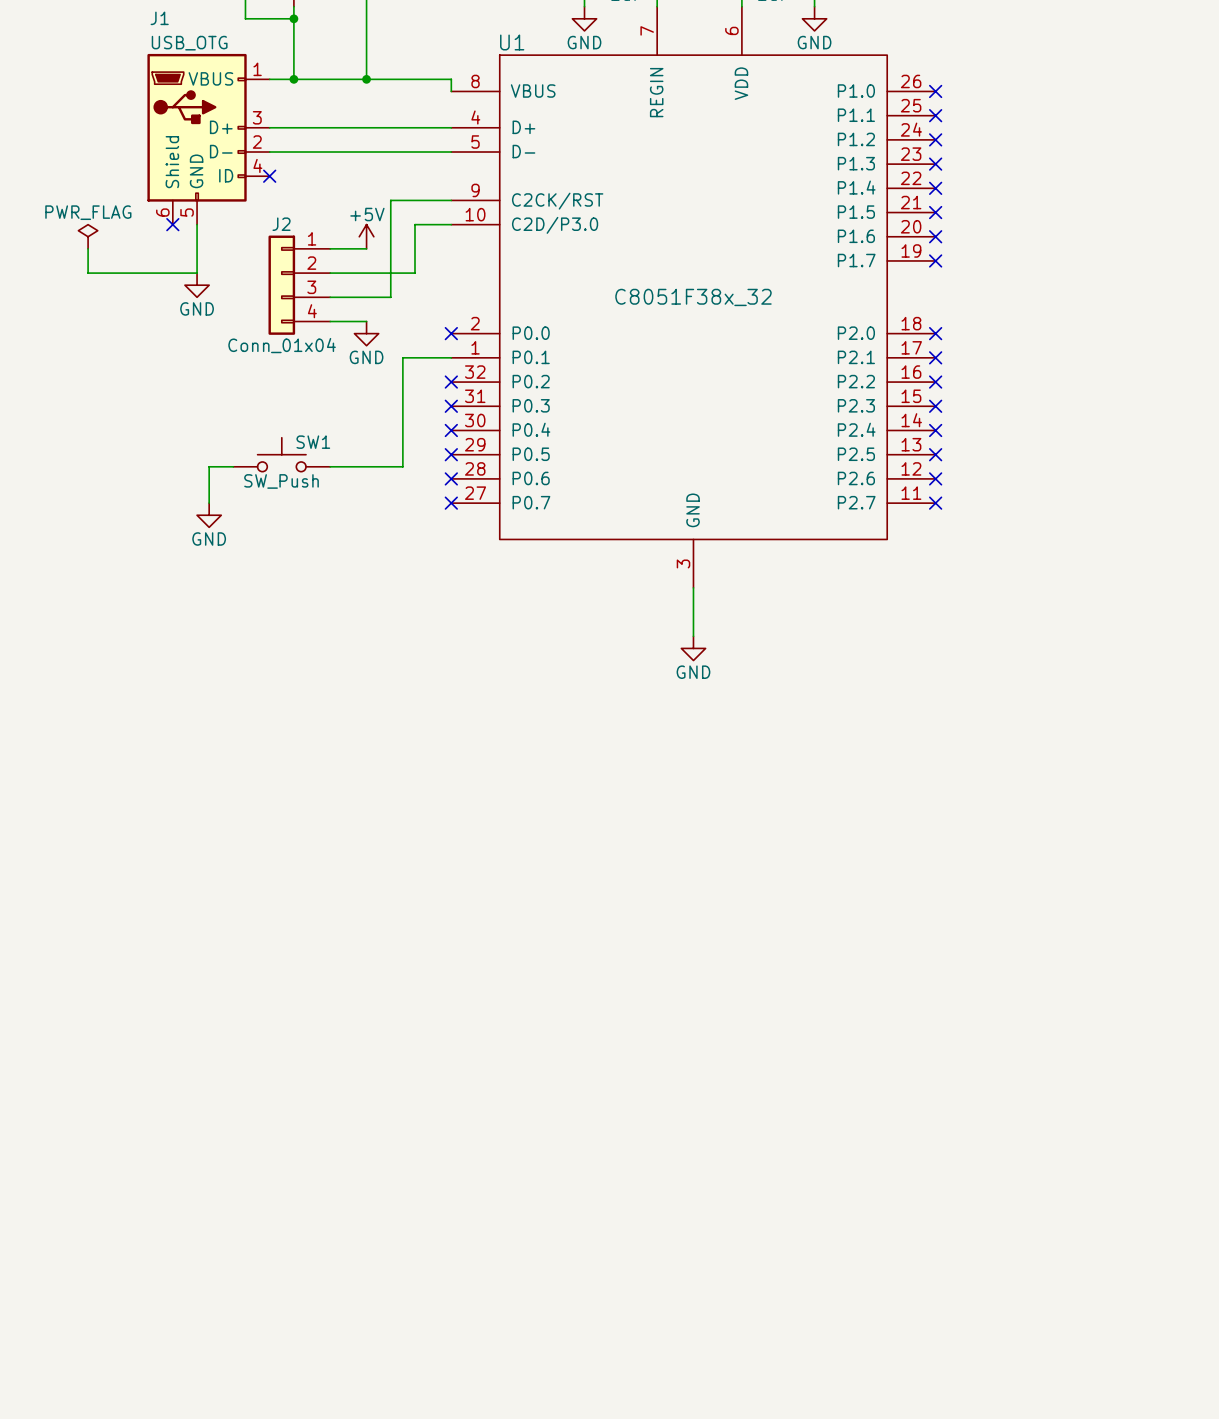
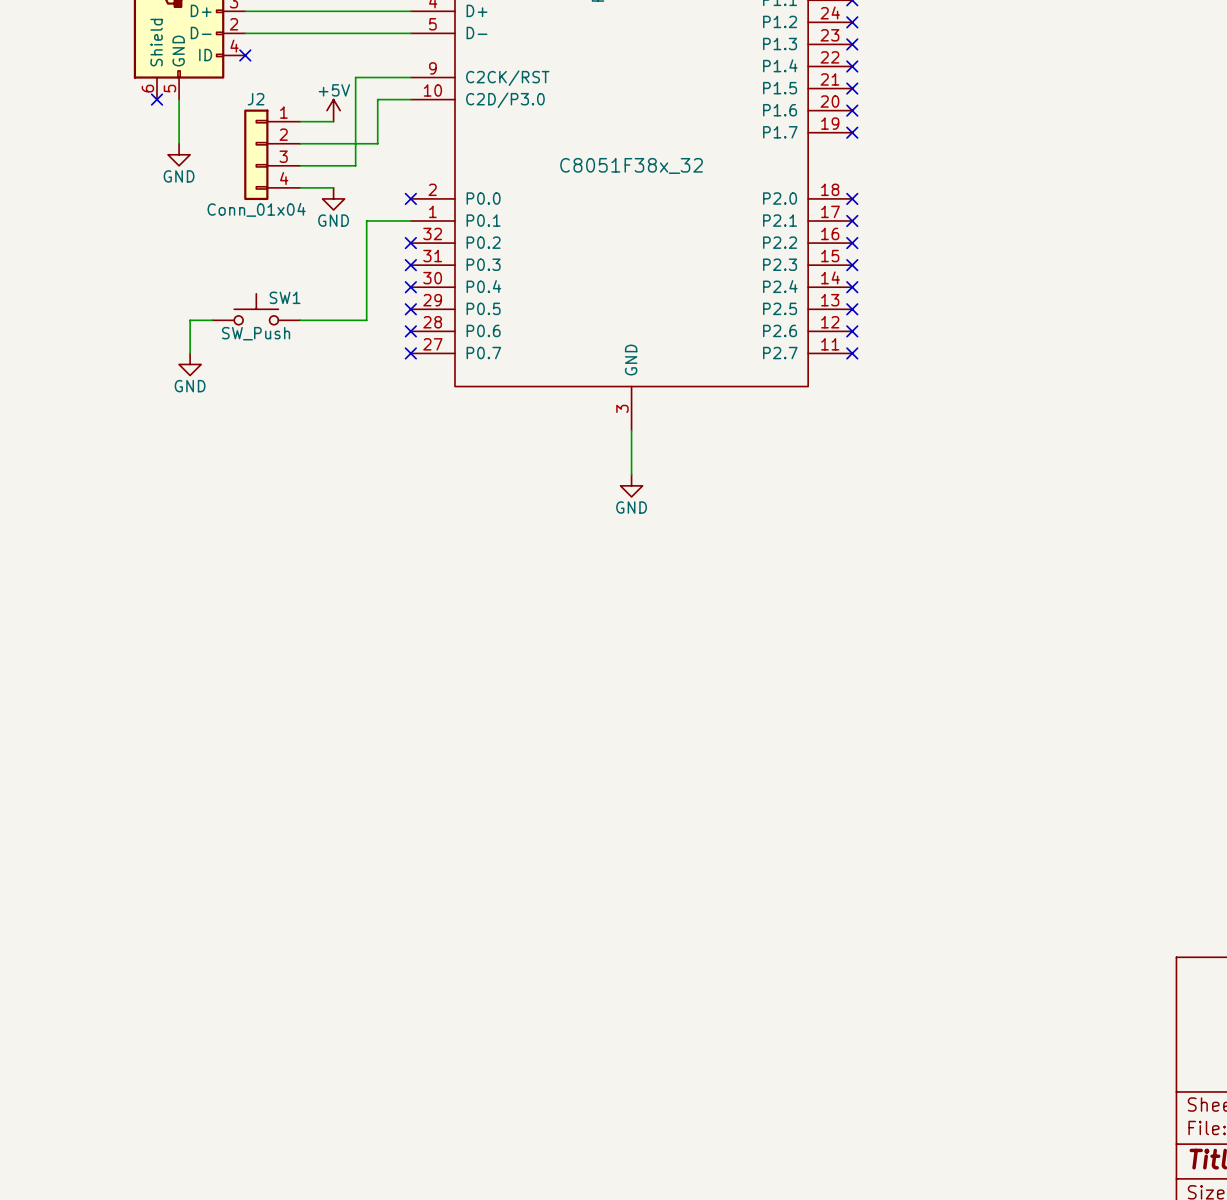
power symbol: PWR_FLAG (88, 236) -> none
wire: (88, 248) (88, 273) (197, 273) -> none

